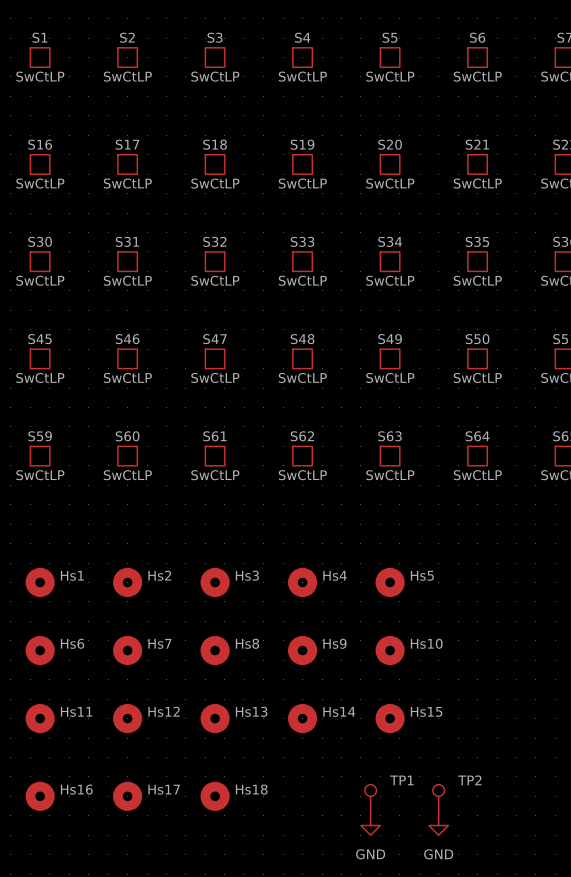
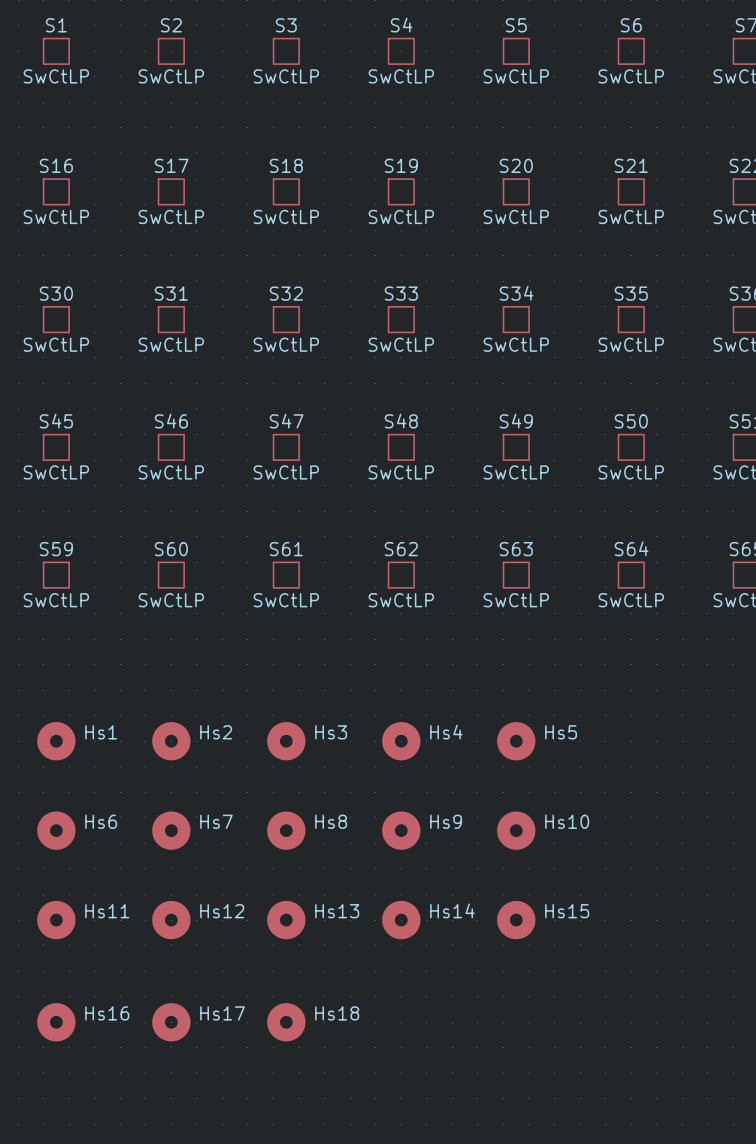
TP1: (370, 800) -> none
TP2: (438, 800) -> none
power symbol: GND (370, 825) -> none
power symbol: GND (438, 825) -> none

